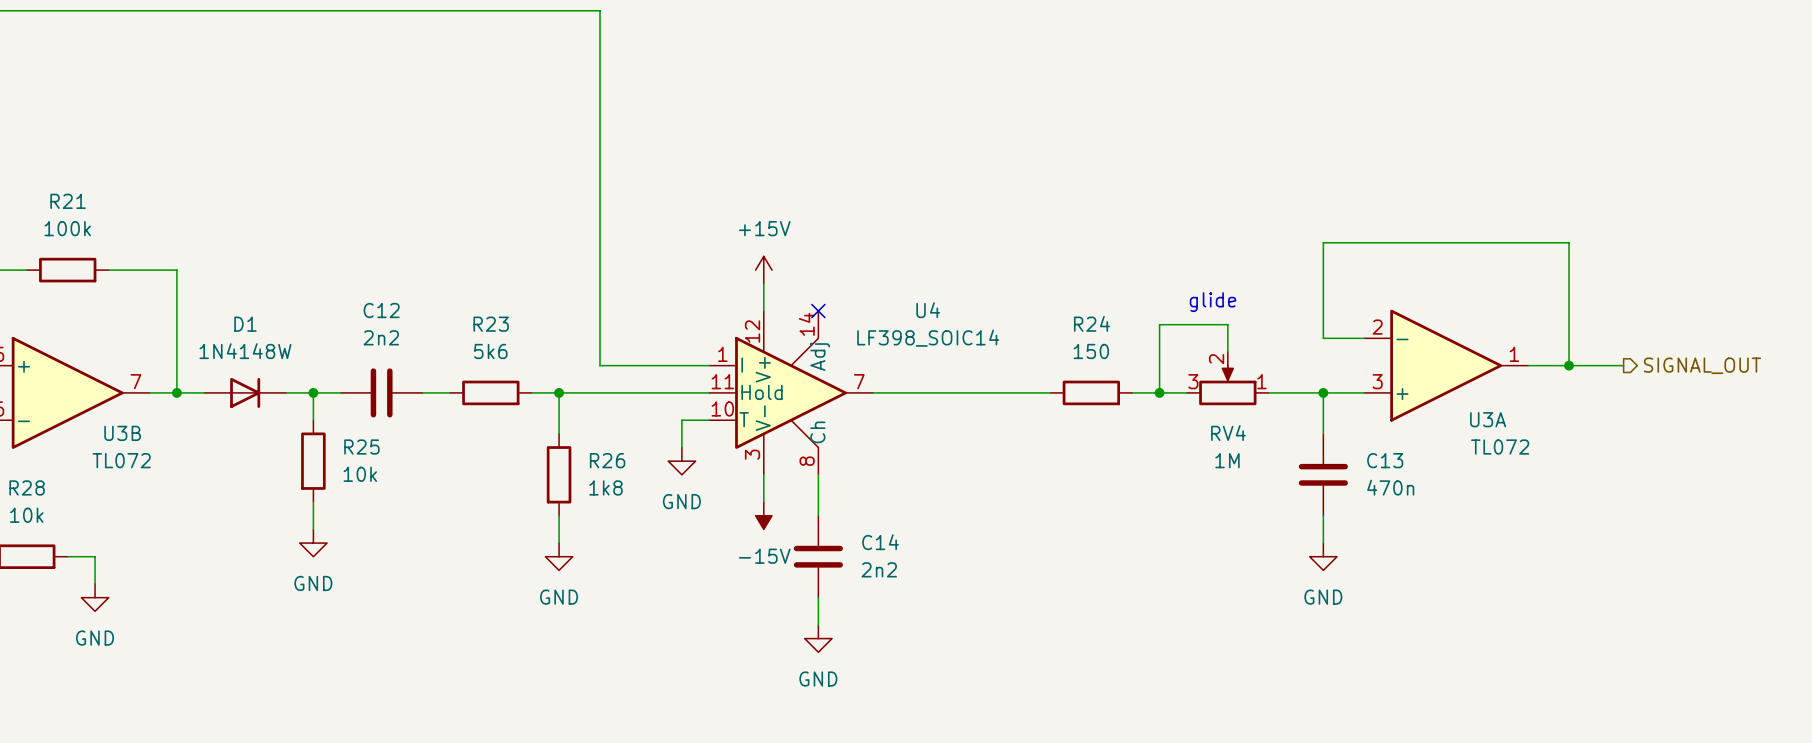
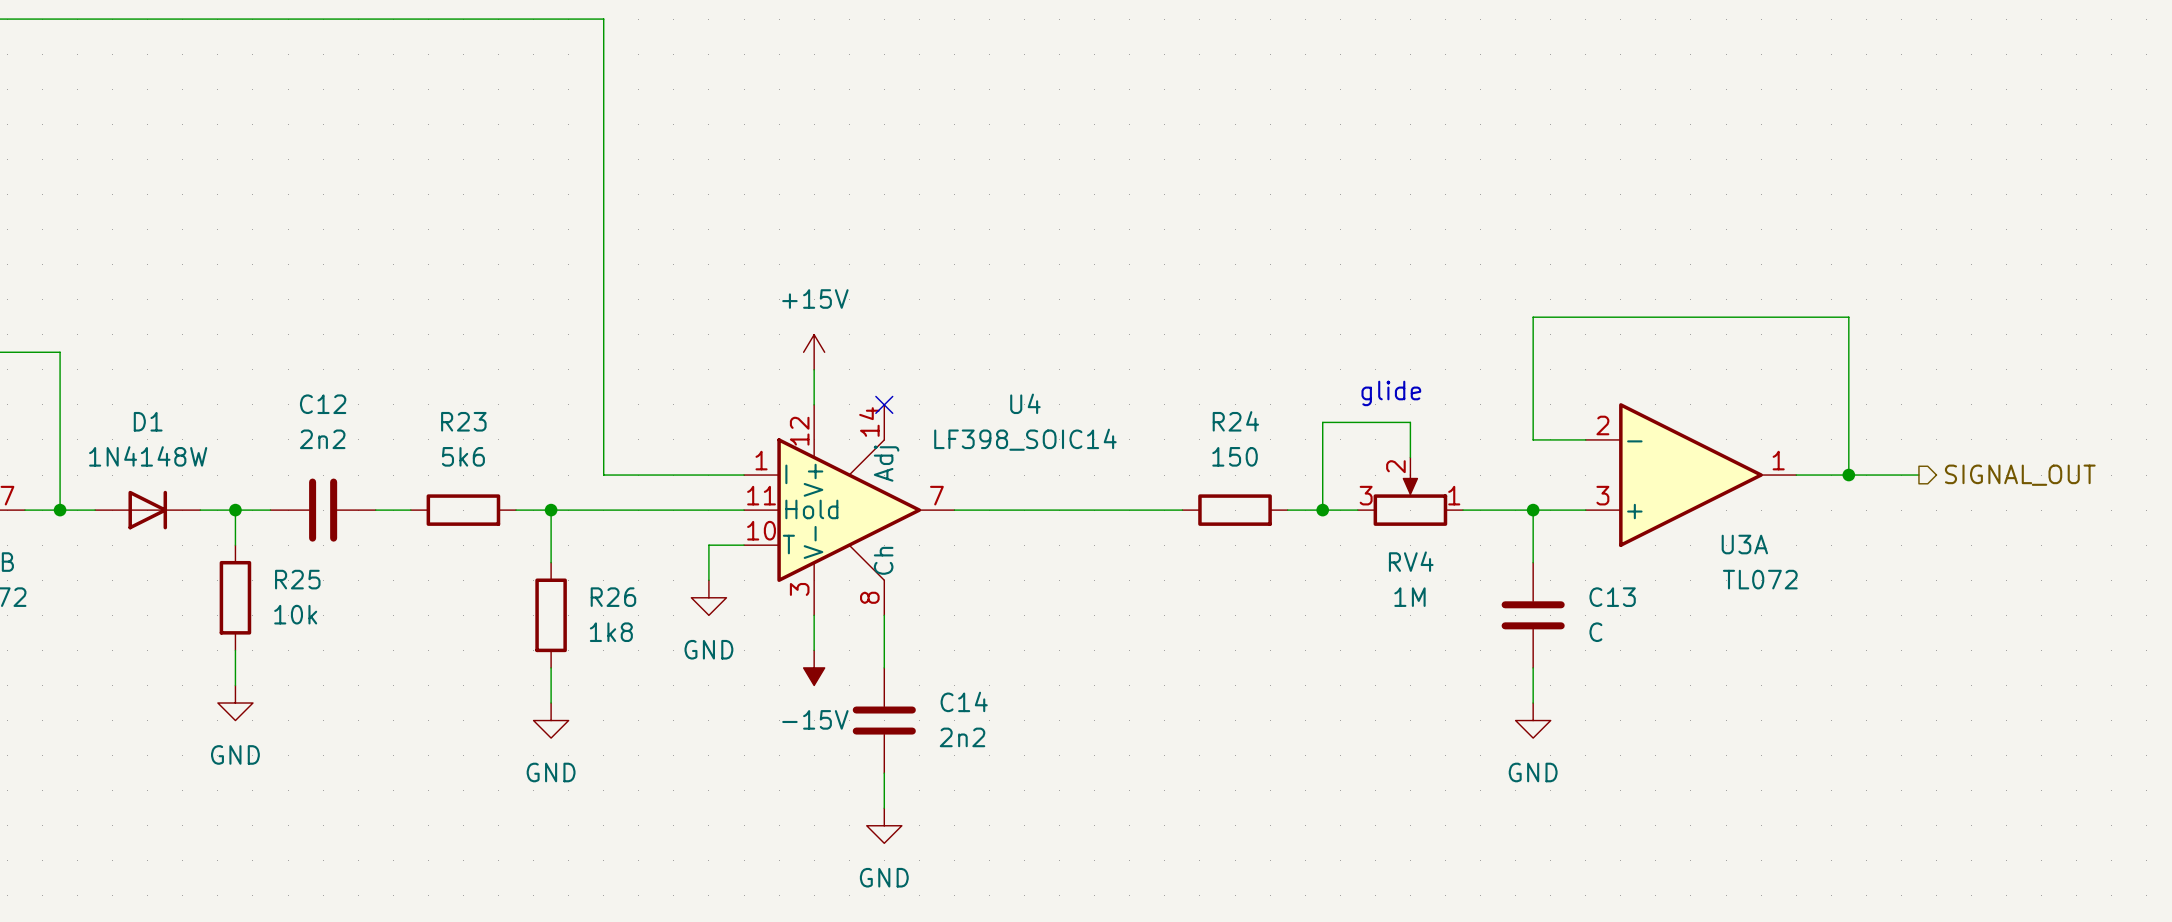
C13 value: 470n (1390, 487) -> C (1595, 632)

